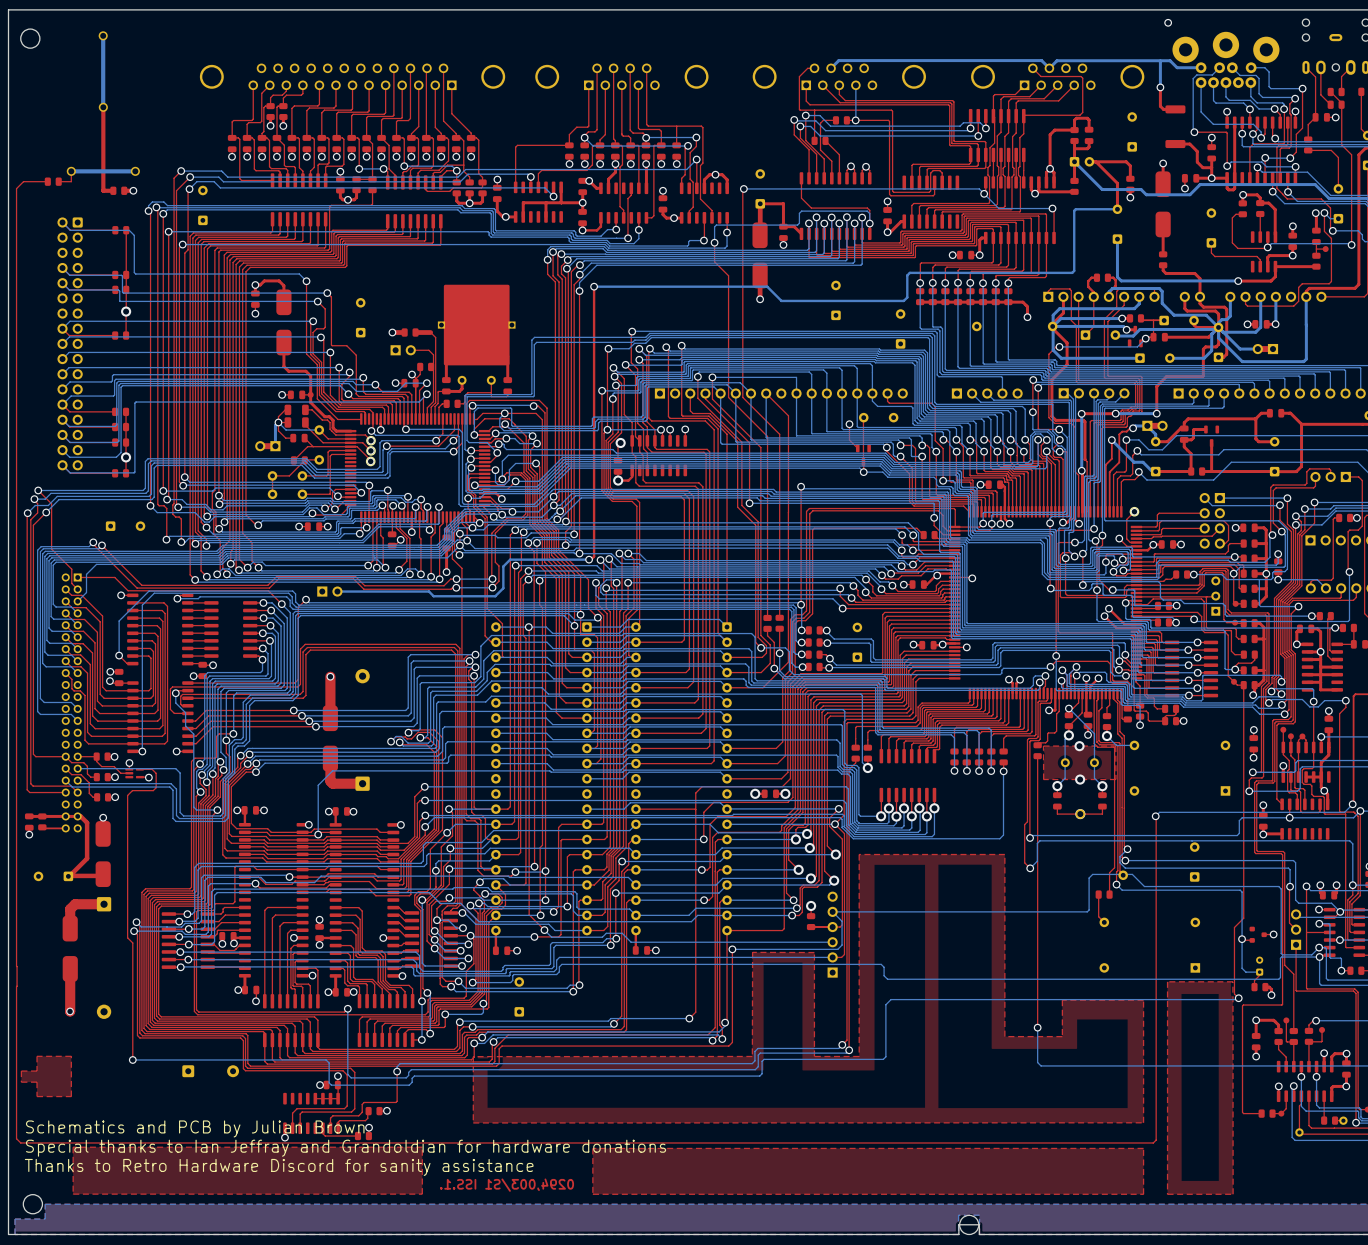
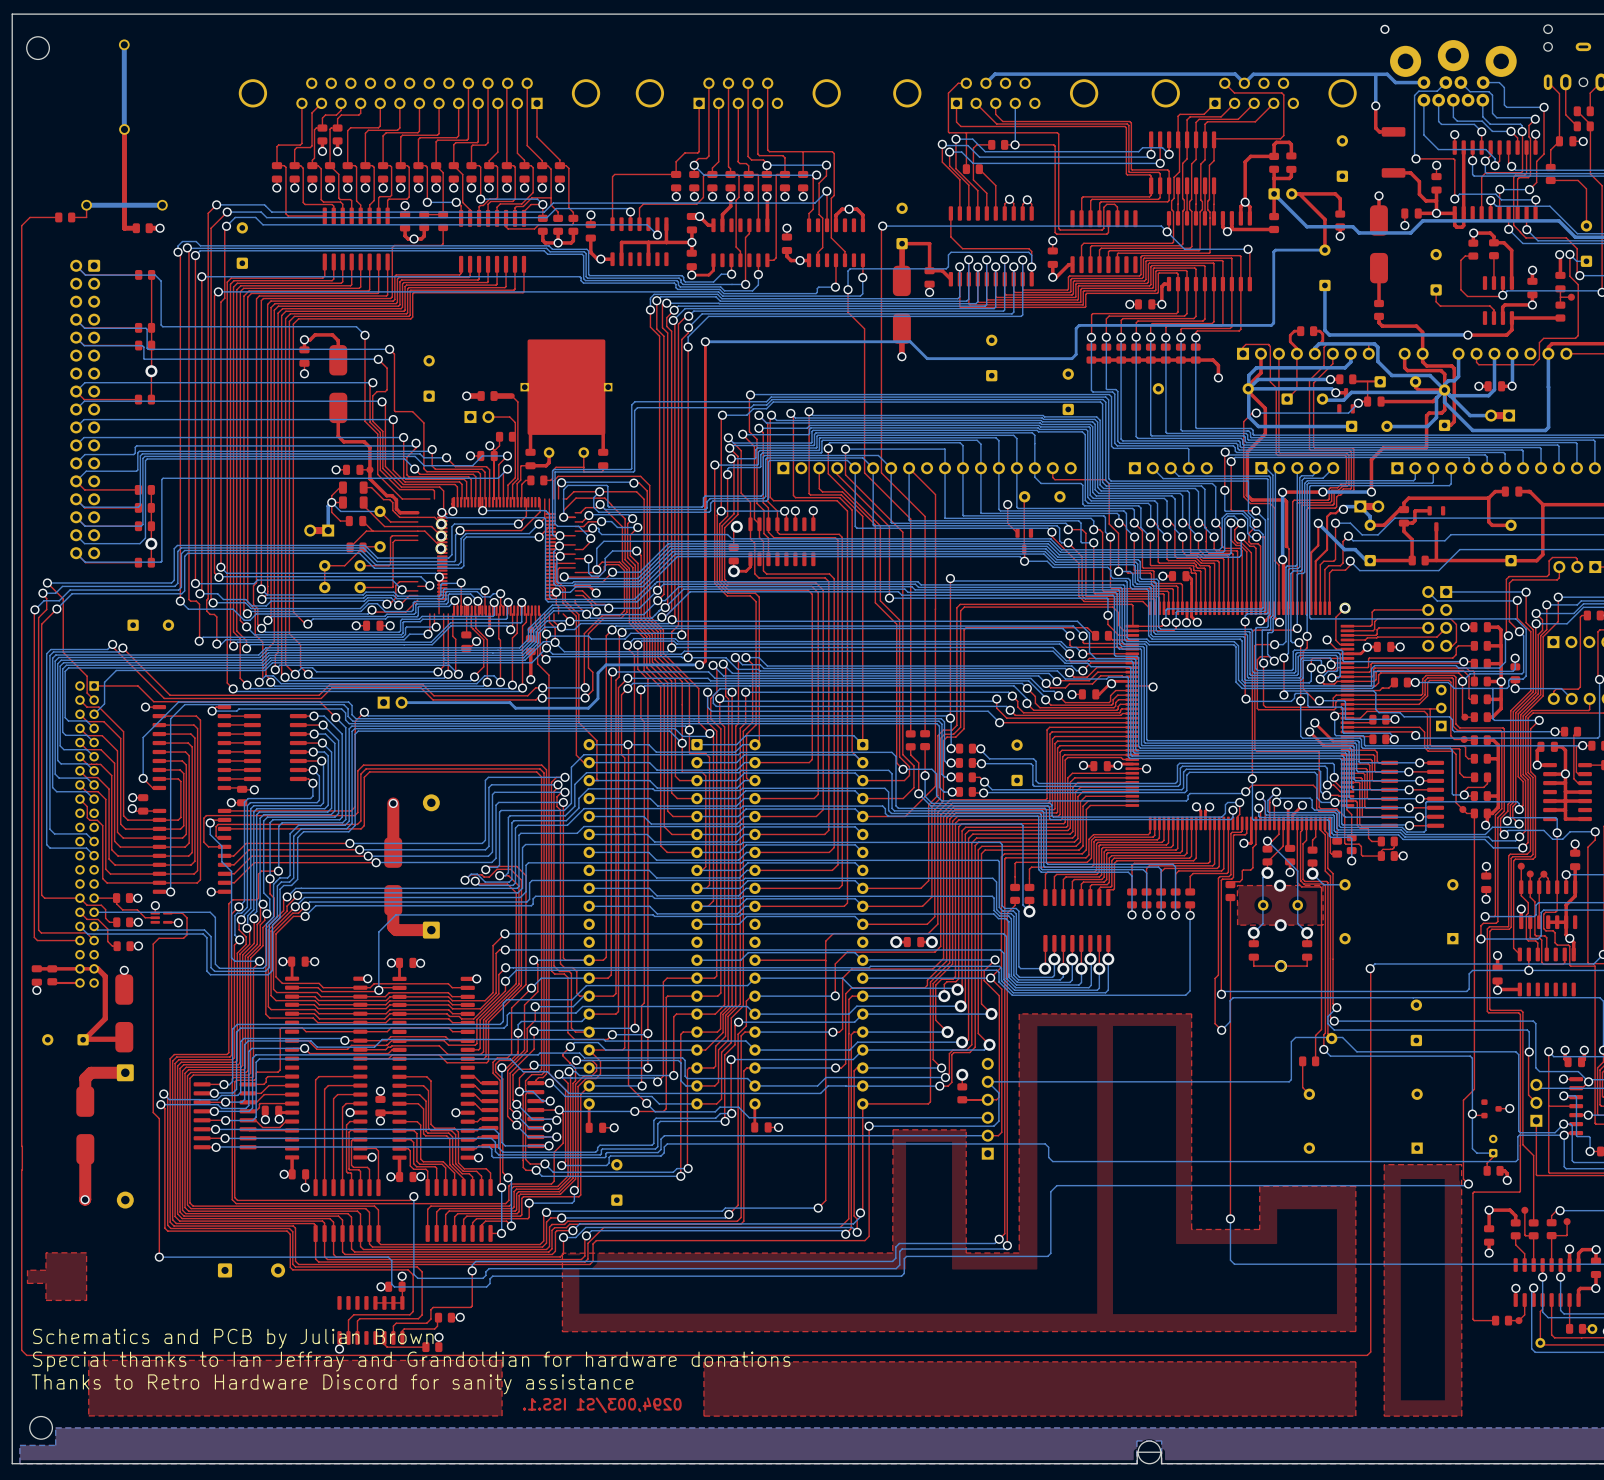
part footprint: [344, 413, 491, 523] -> [437, 497, 556, 616]

